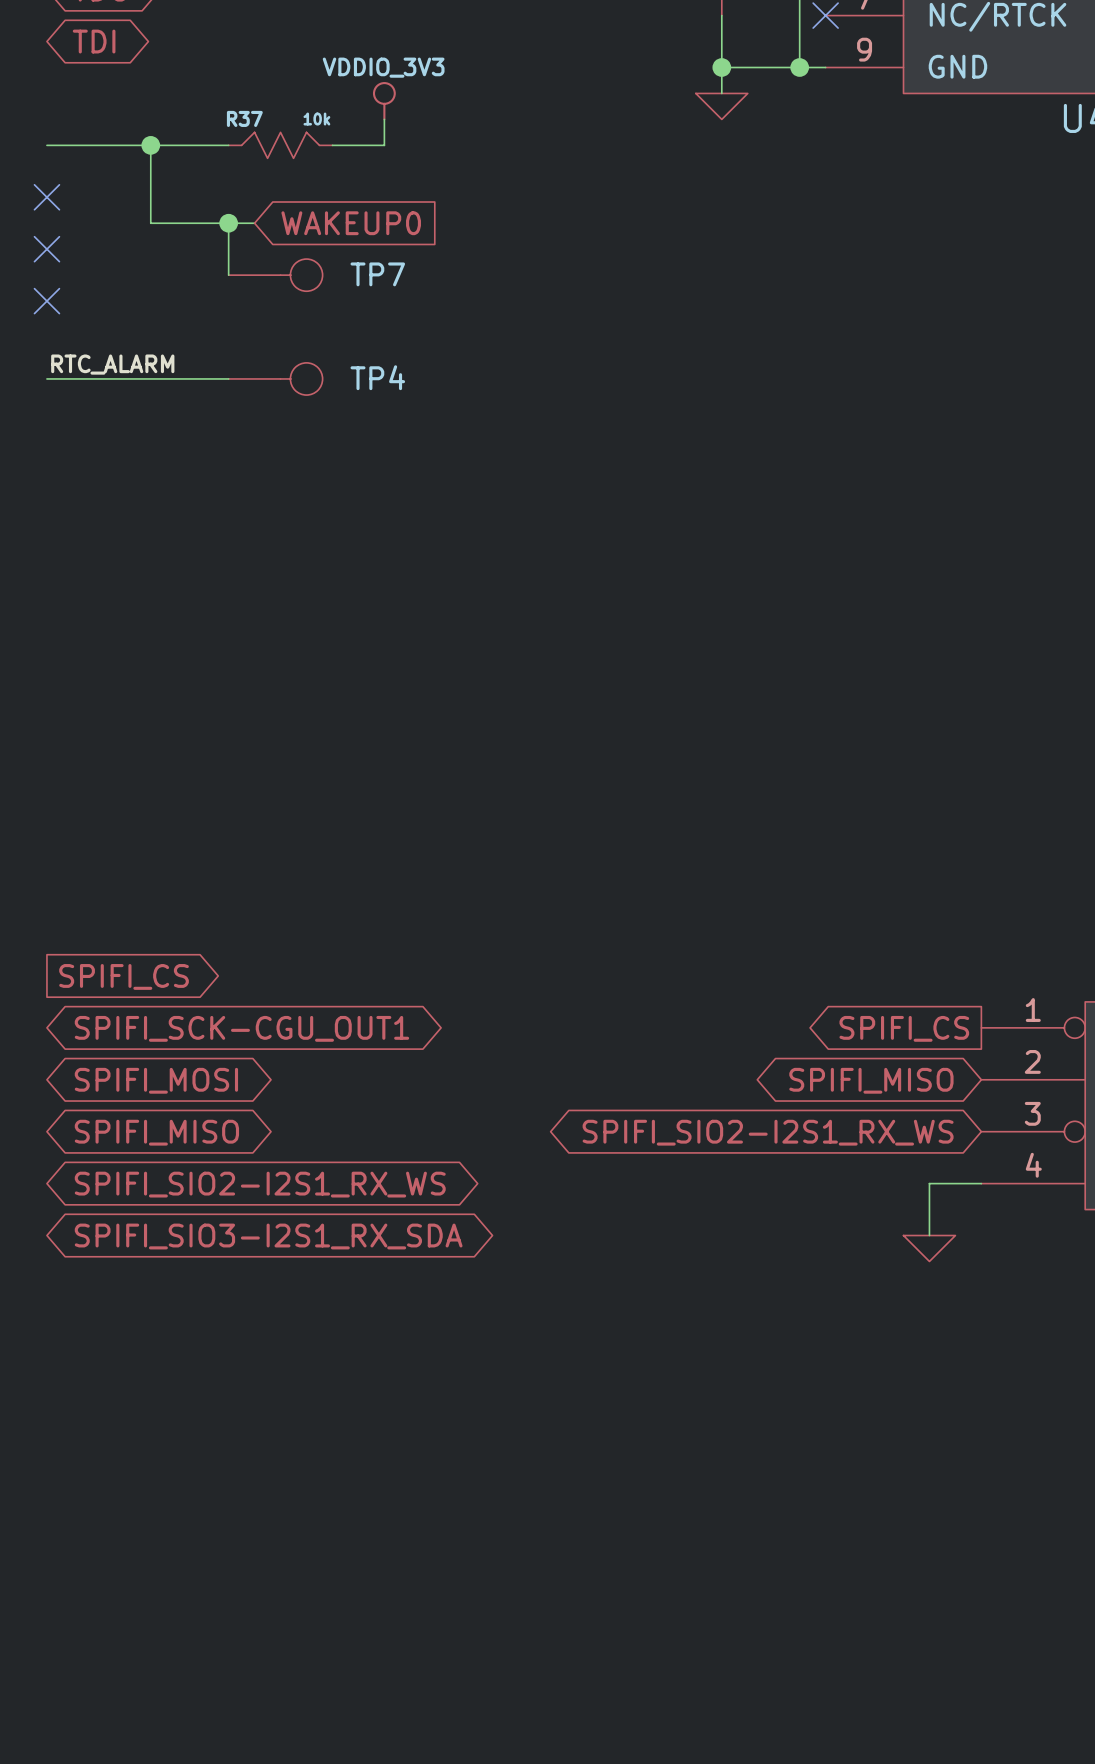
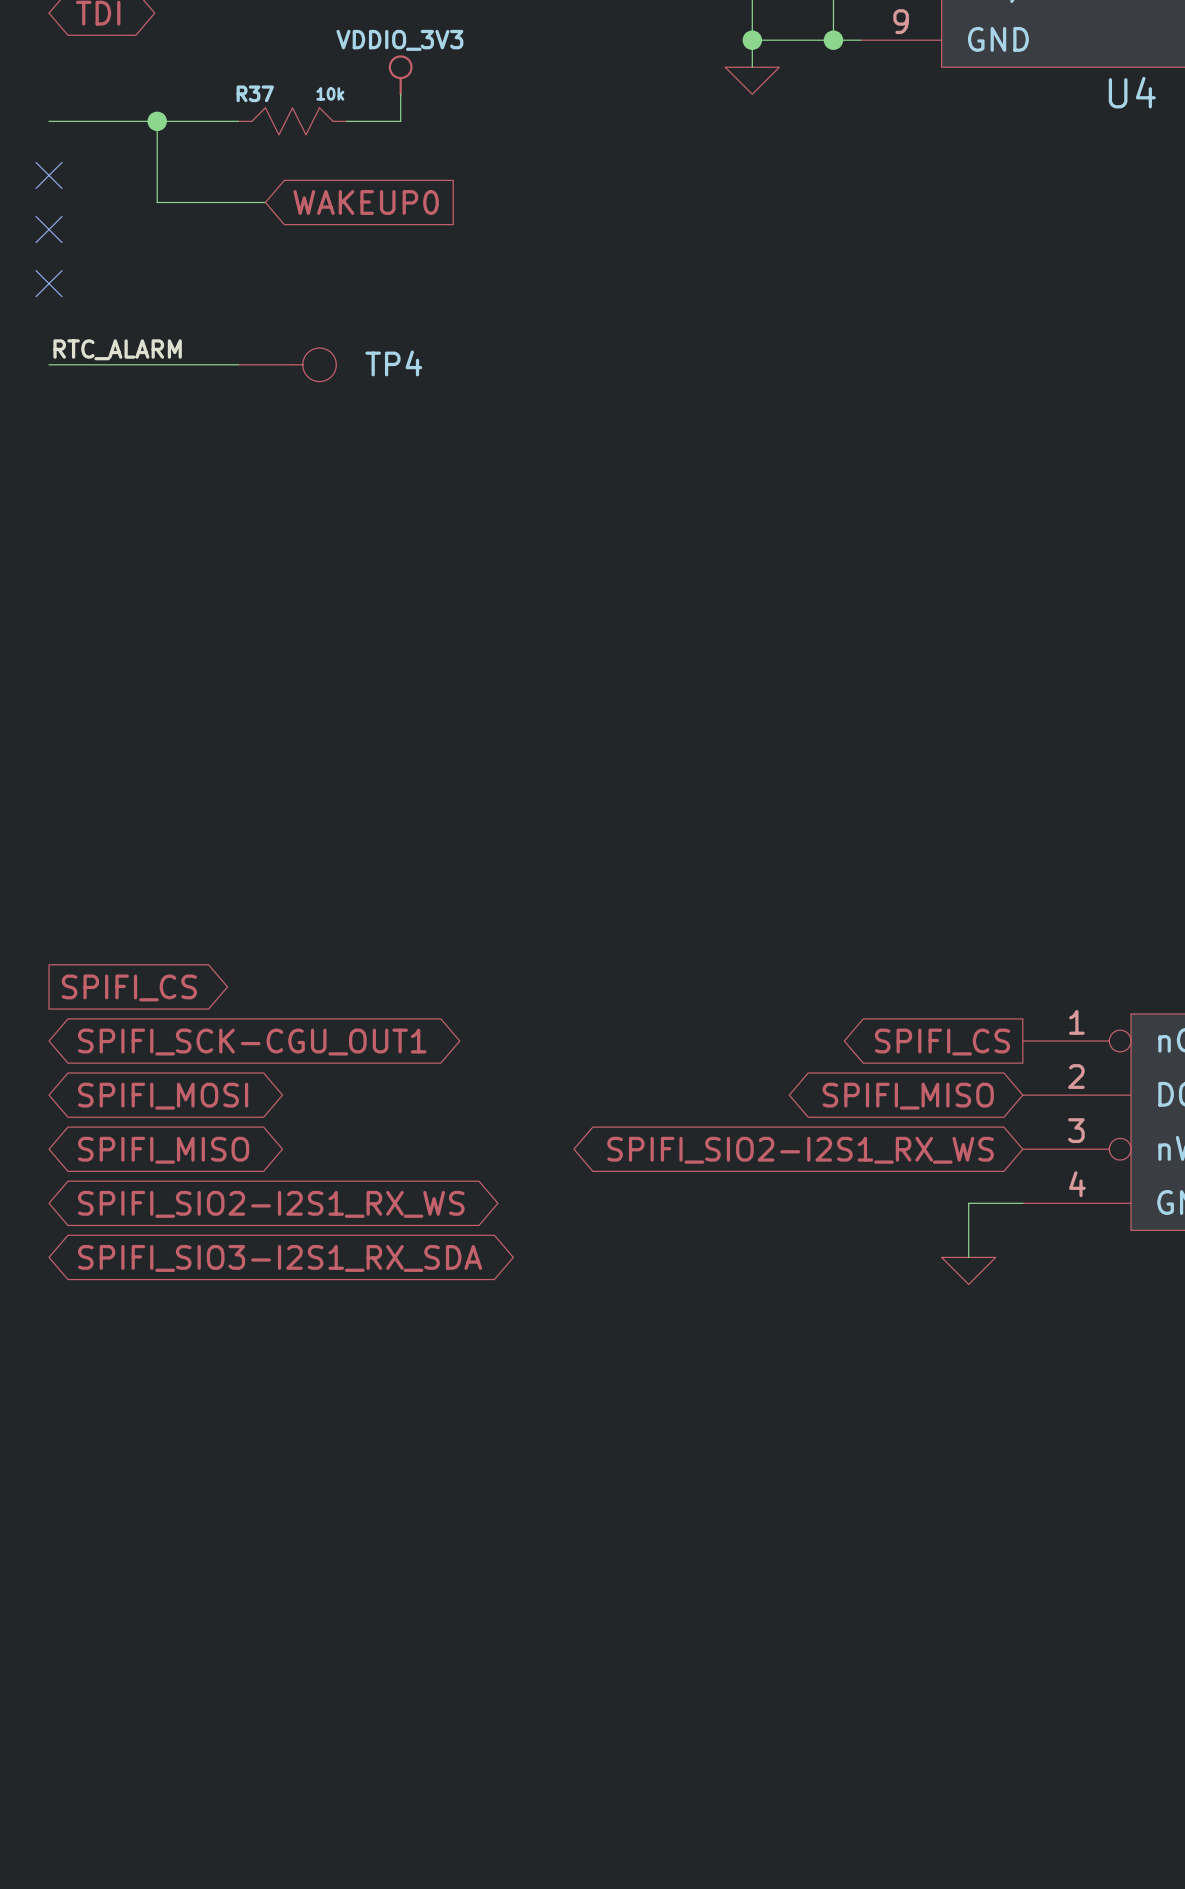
wire: (228, 223) (228, 275) -> none
junction: (228, 223) -> none
TP7: (275, 275) -> none

